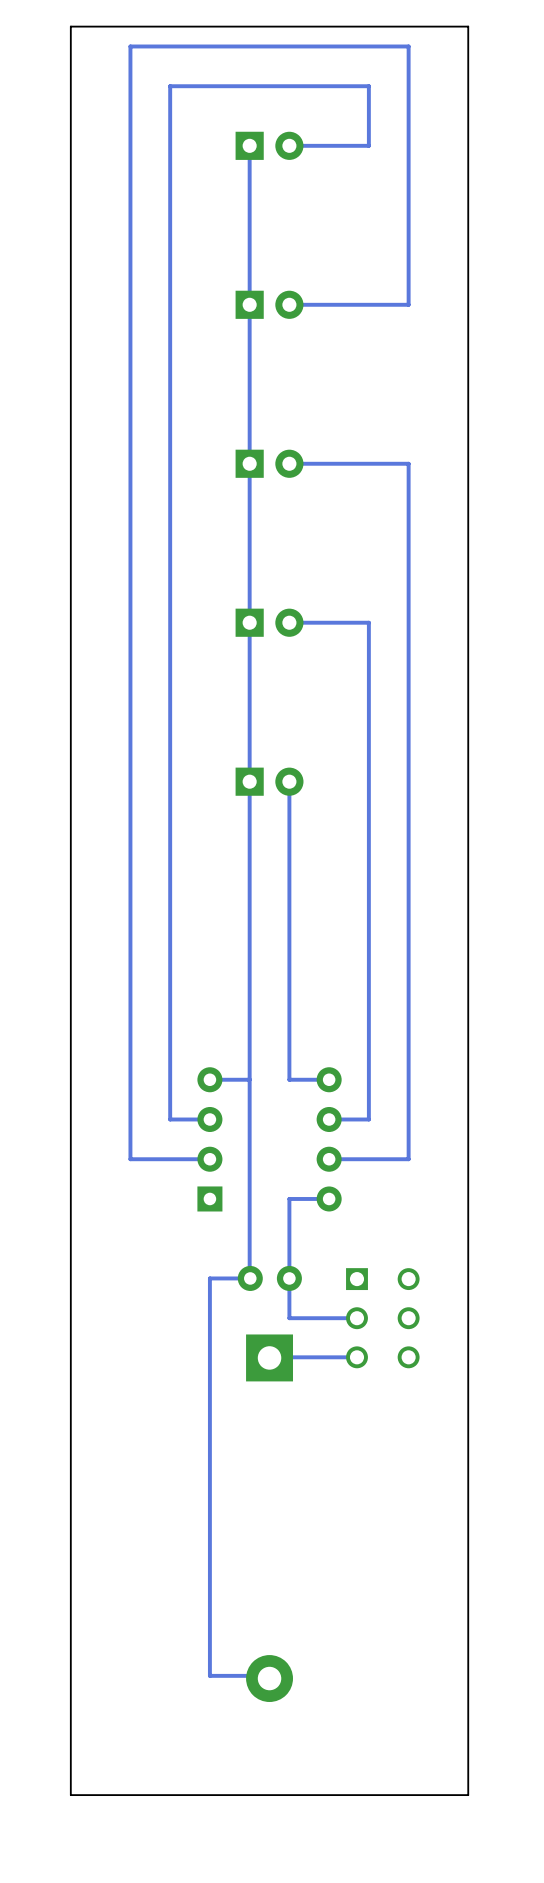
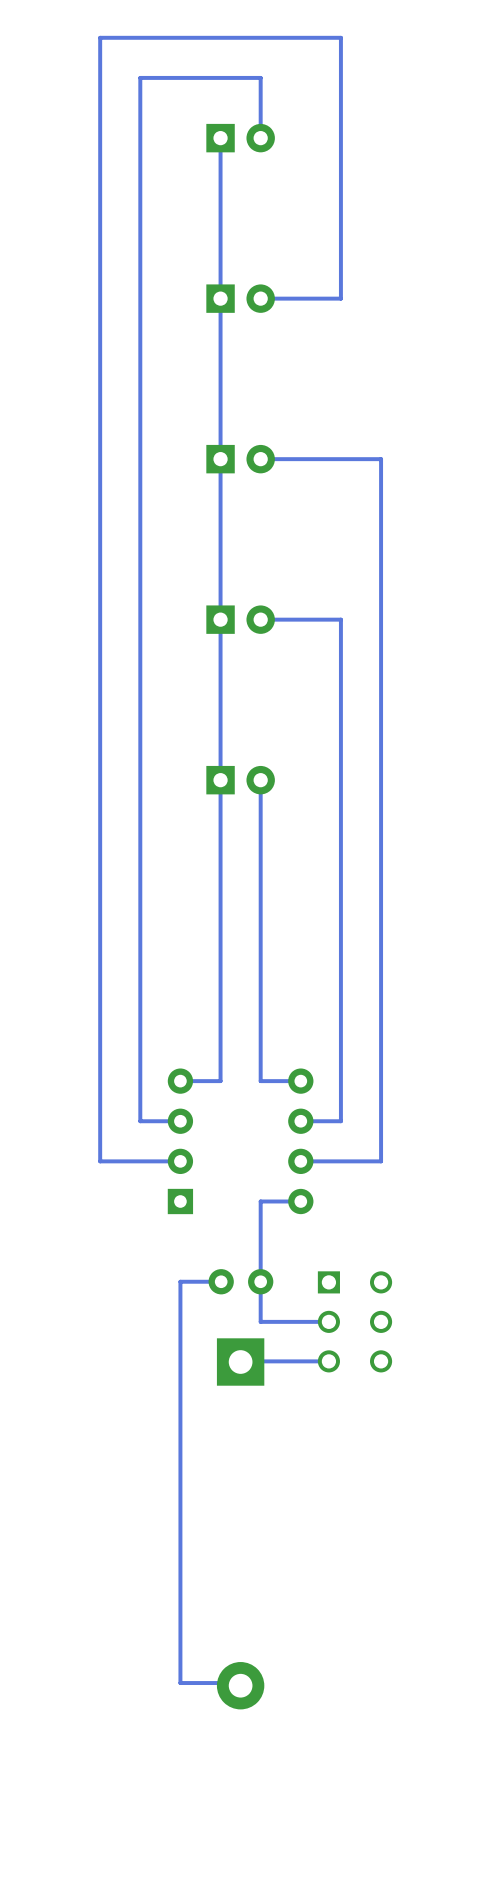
board edge: (468, 26) (70, 26) (70, 1795) (468, 1795) (468, 26) -> none
bottom track: (368, 46) (408, 46) (408, 304) (368, 304) -> (340, 138) (340, 298)
bottom track: (368, 86) (289, 86) -> (340, 77) (340, 37)
bottom track: (368, 145) (289, 145) -> (260, 77) (260, 138)
bottom track: (249, 1079) (250, 1278) -> none

